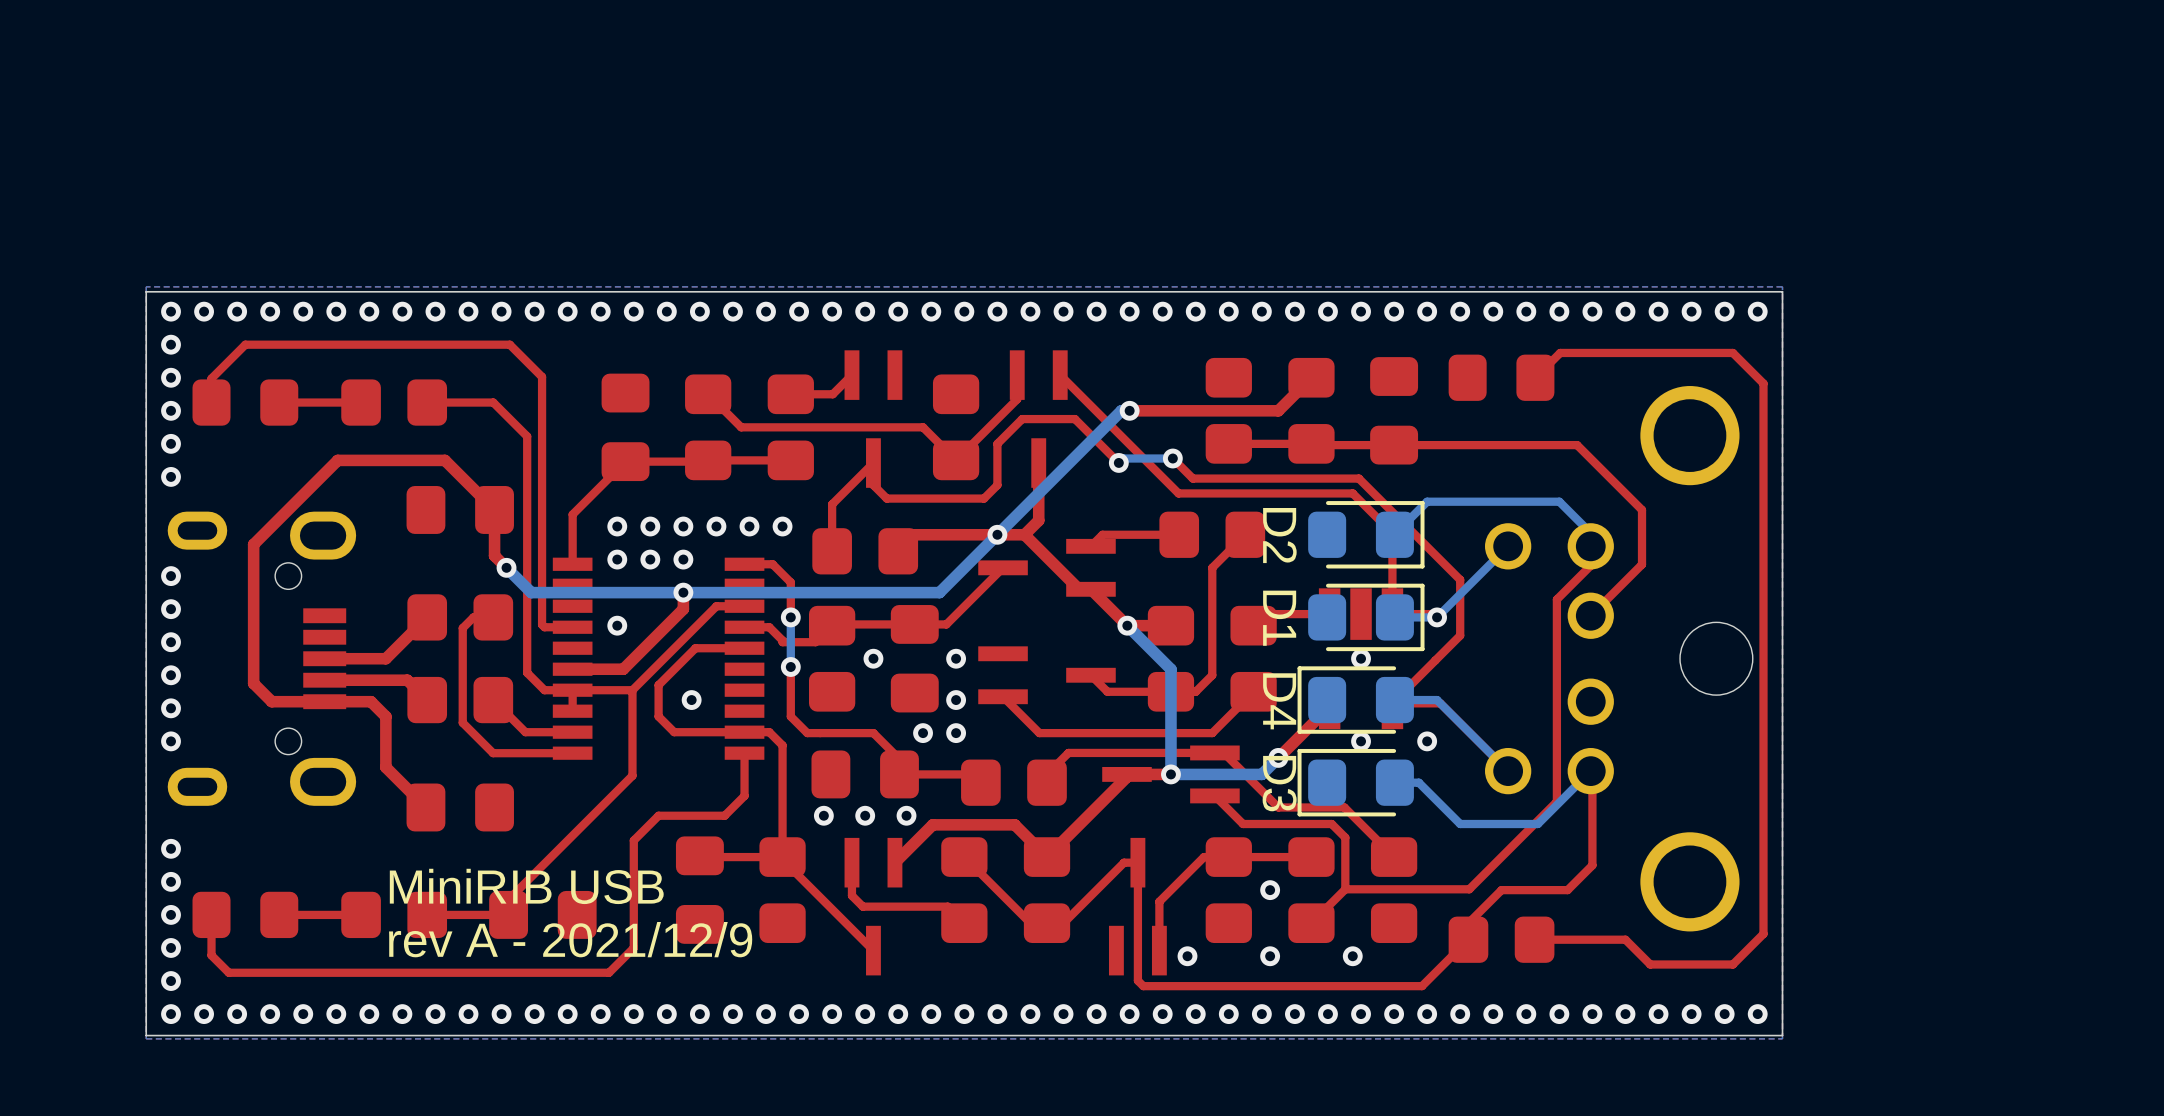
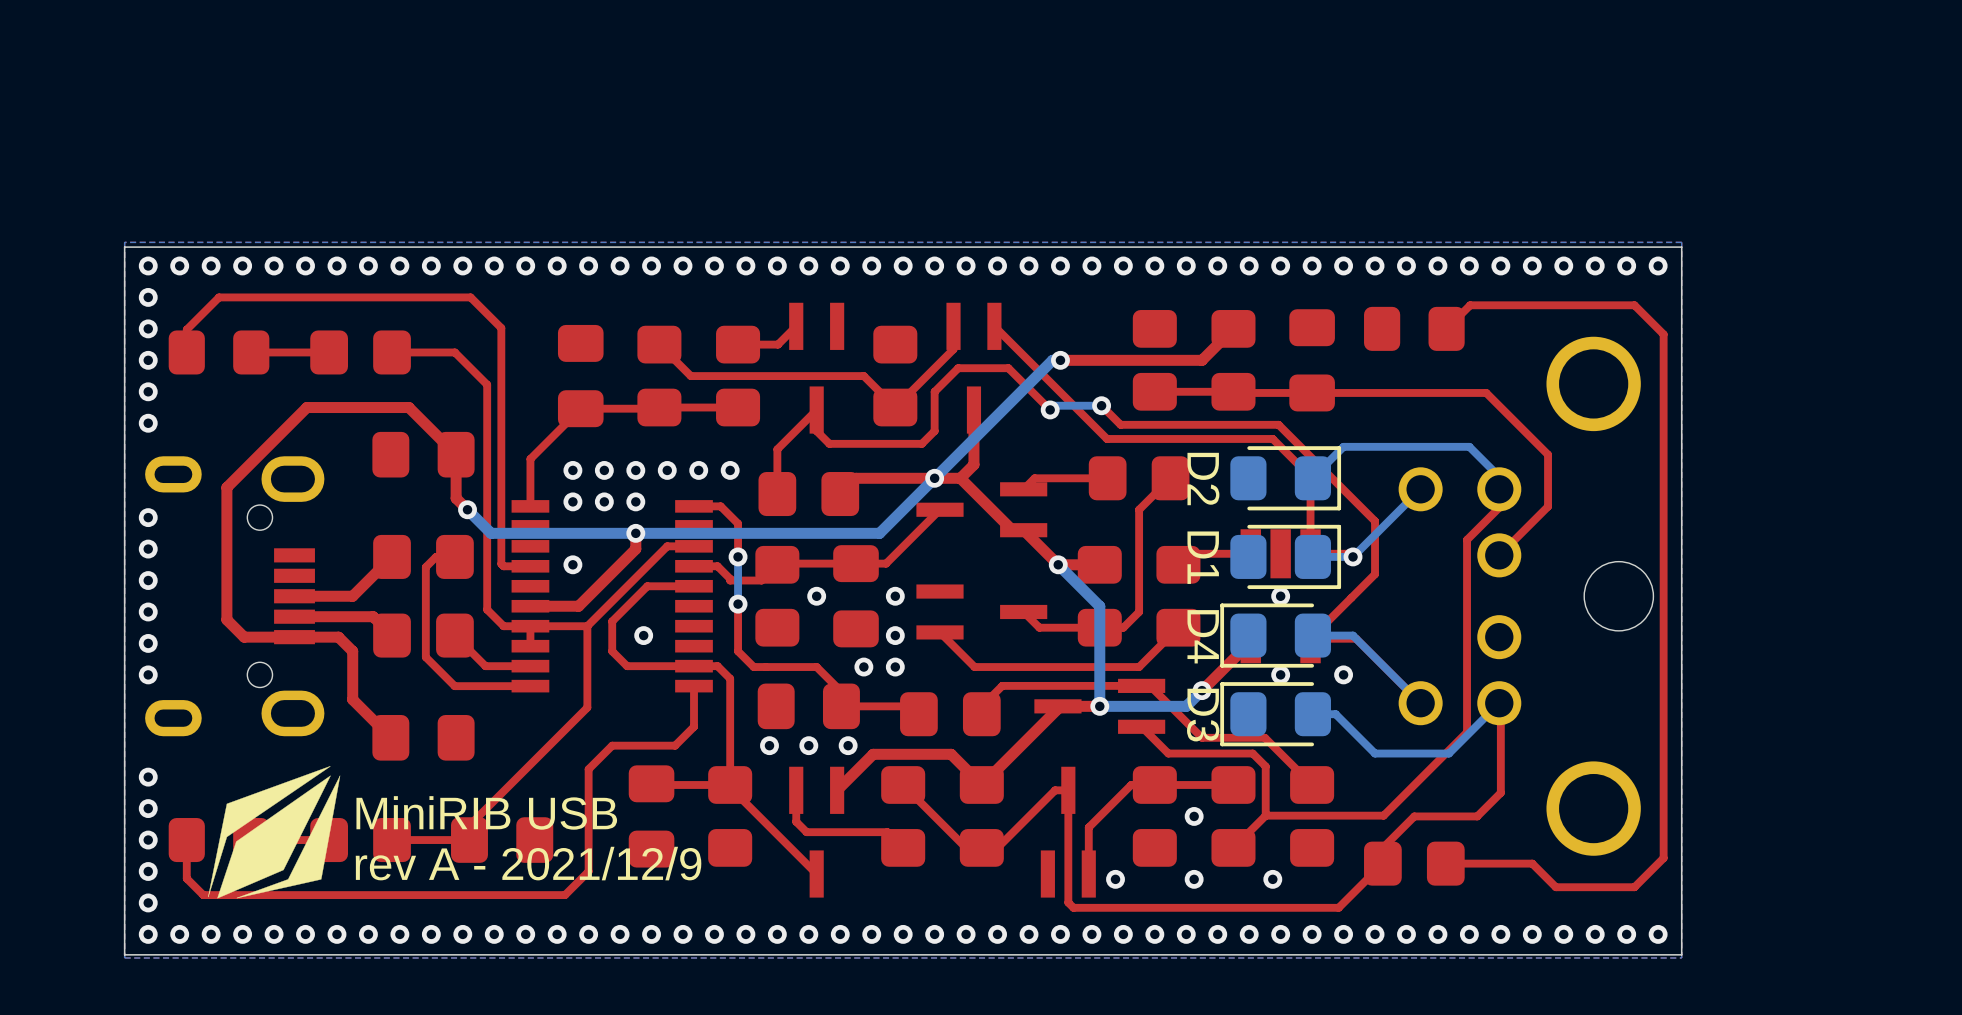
drawing: none -> [208, 766, 341, 899]

